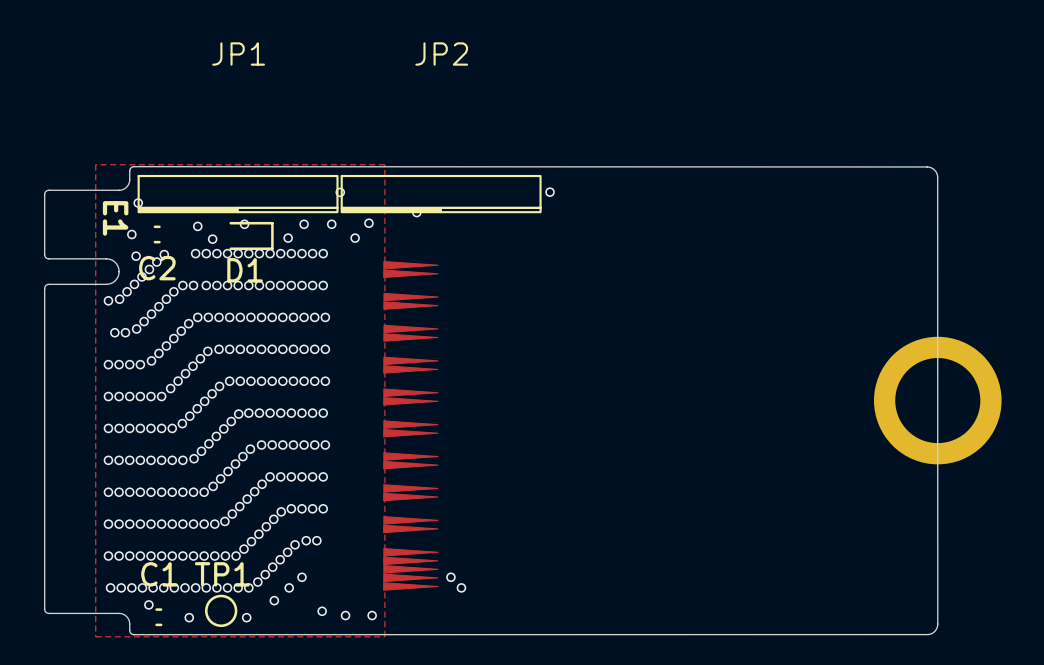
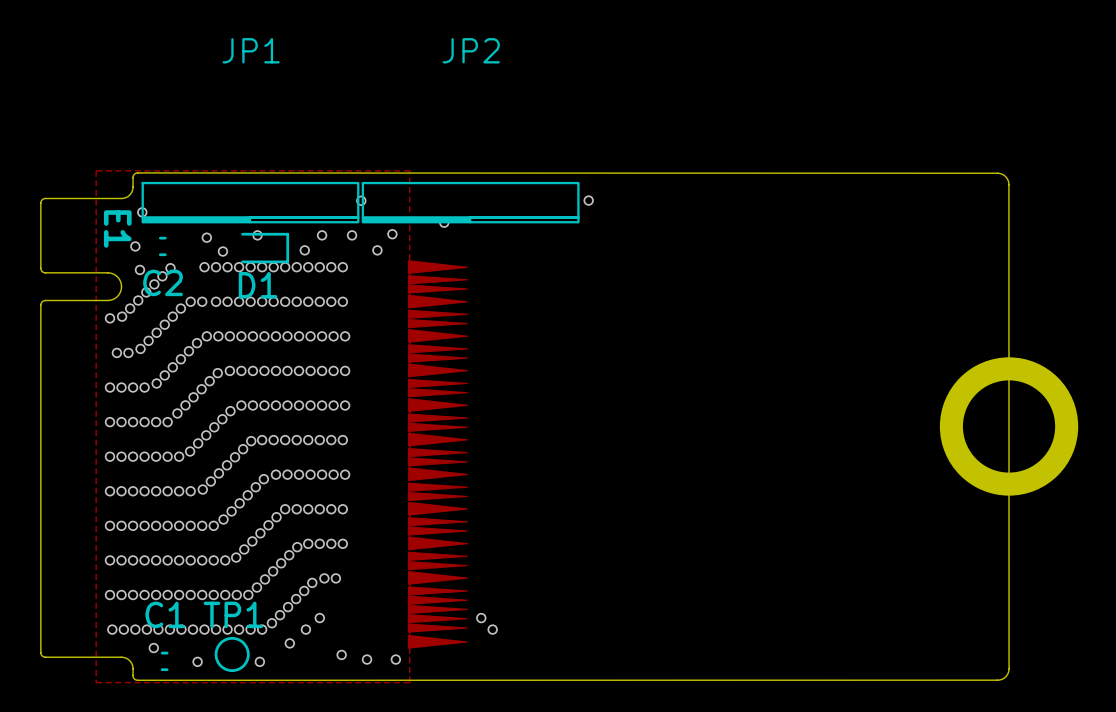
drawing: none -> [407, 260, 469, 585]
drawing: none -> [407, 634, 468, 649]

